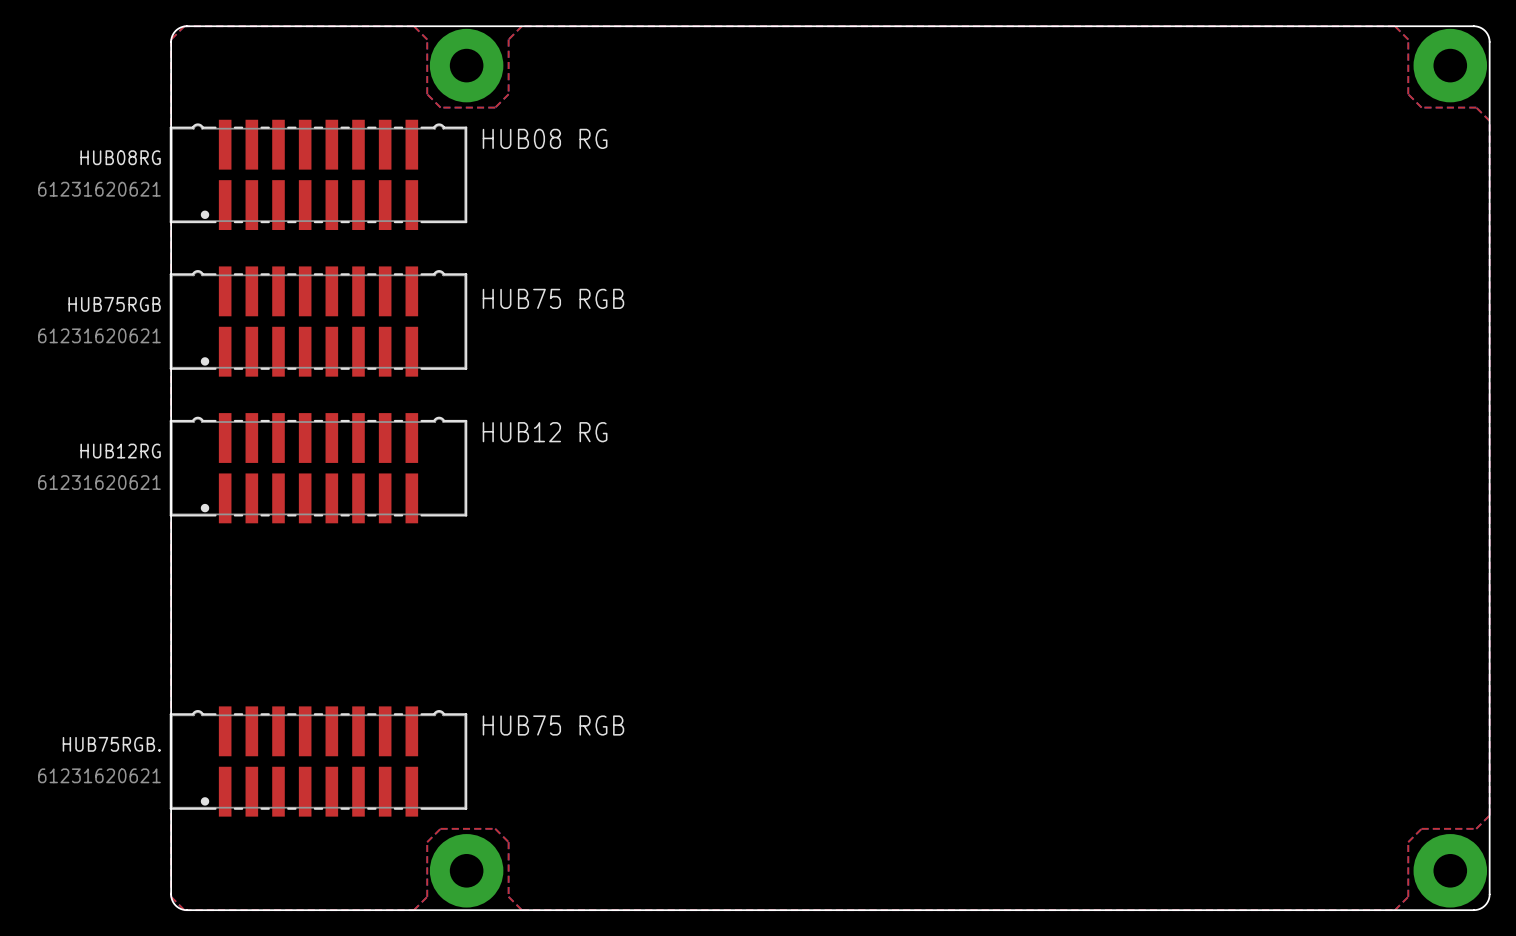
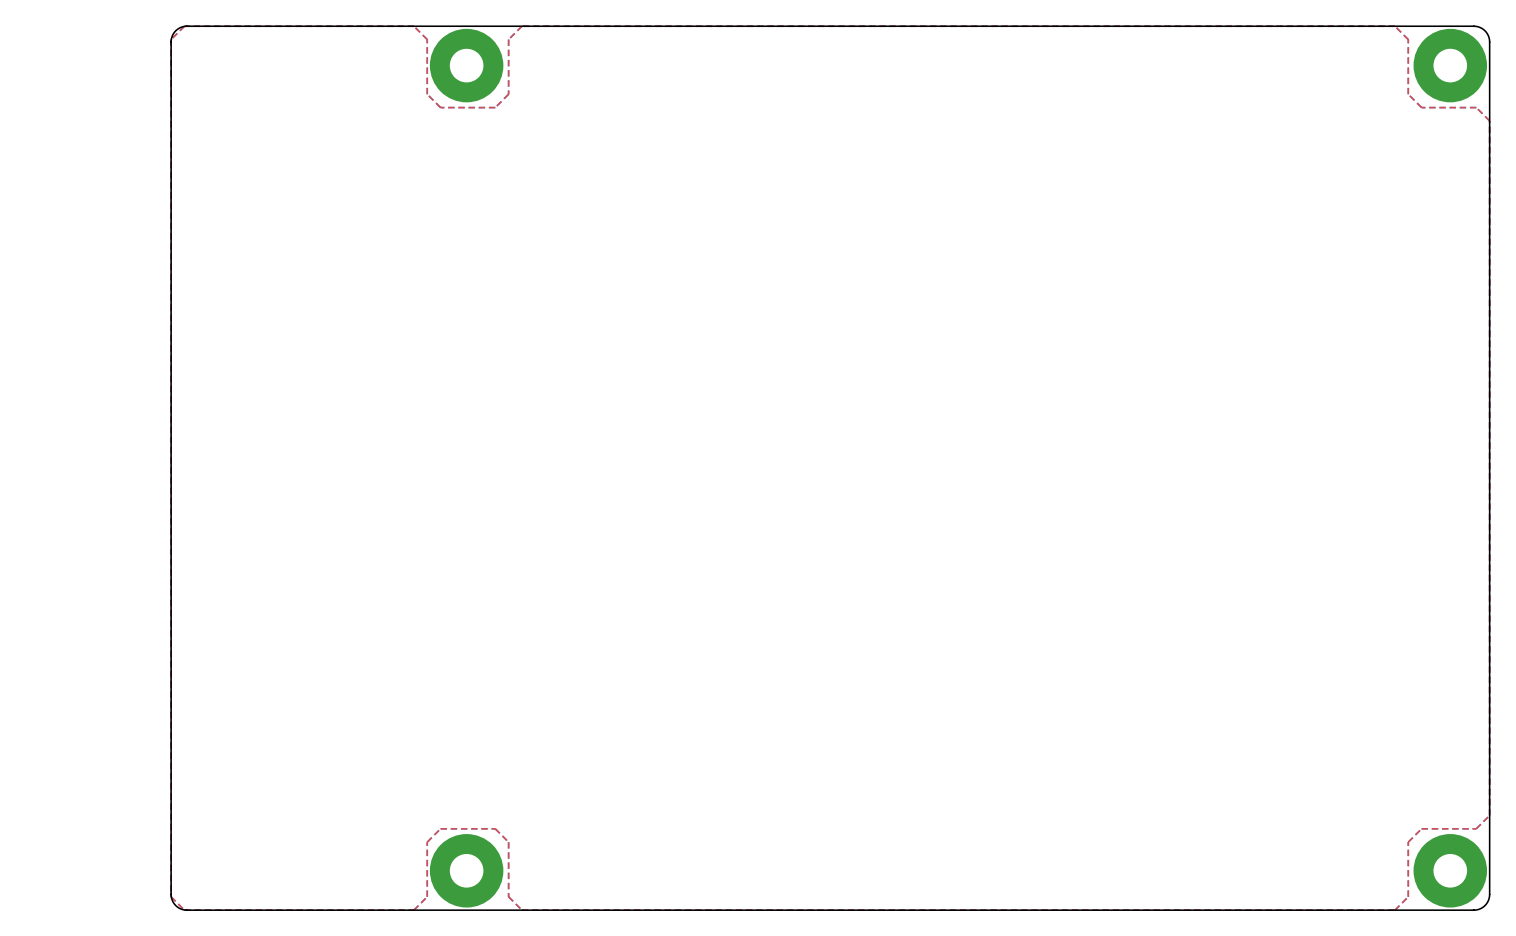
text: HUB08 RG (545, 138) -> none
HUB08RG: 61231620621 (318, 174) -> none
text: HUB75 RGB (553, 298) -> none
HUB75RGB: 61231620621 (318, 321) -> none
text: HUB12 RG (545, 432) -> none
HUB12RG: 61231620621 (318, 468) -> none
text: HUB75 RGB (553, 725) -> none
HUB75RGB.: 61231620621 (318, 761) -> none

